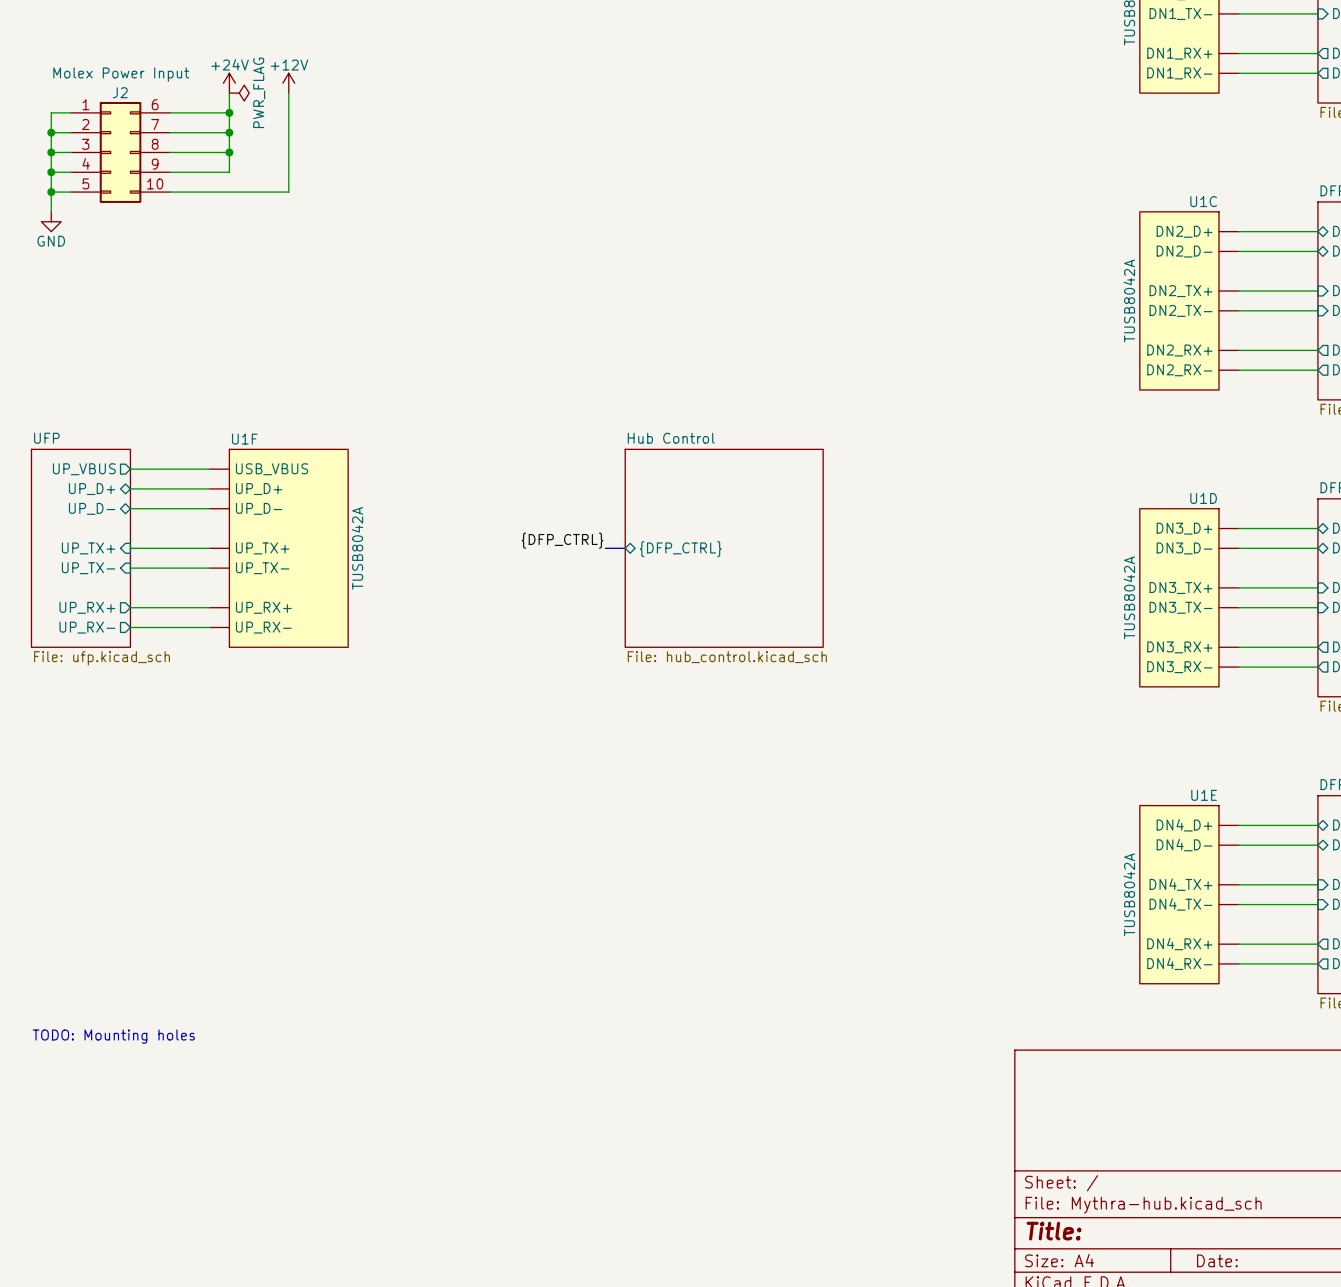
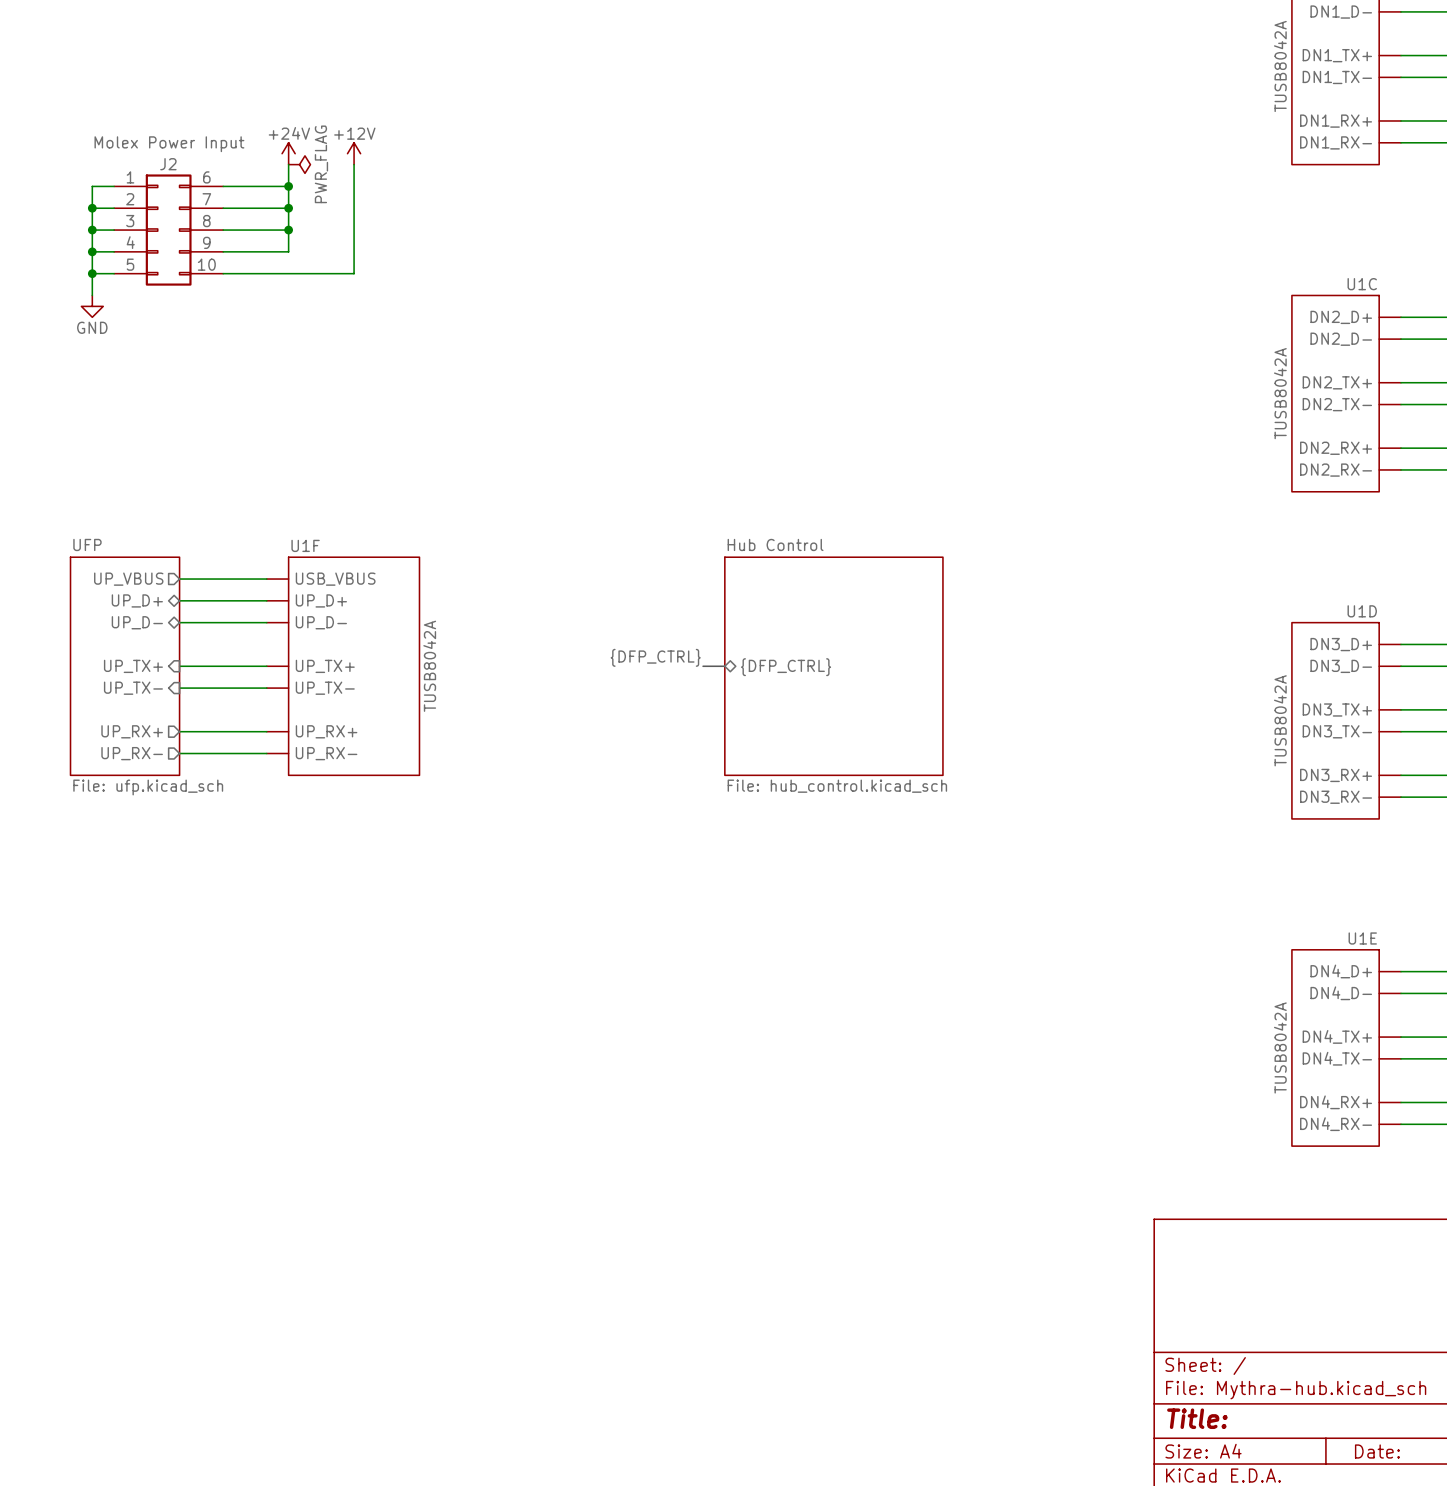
text: TODO: Mounting holes (113, 1036) -> none

